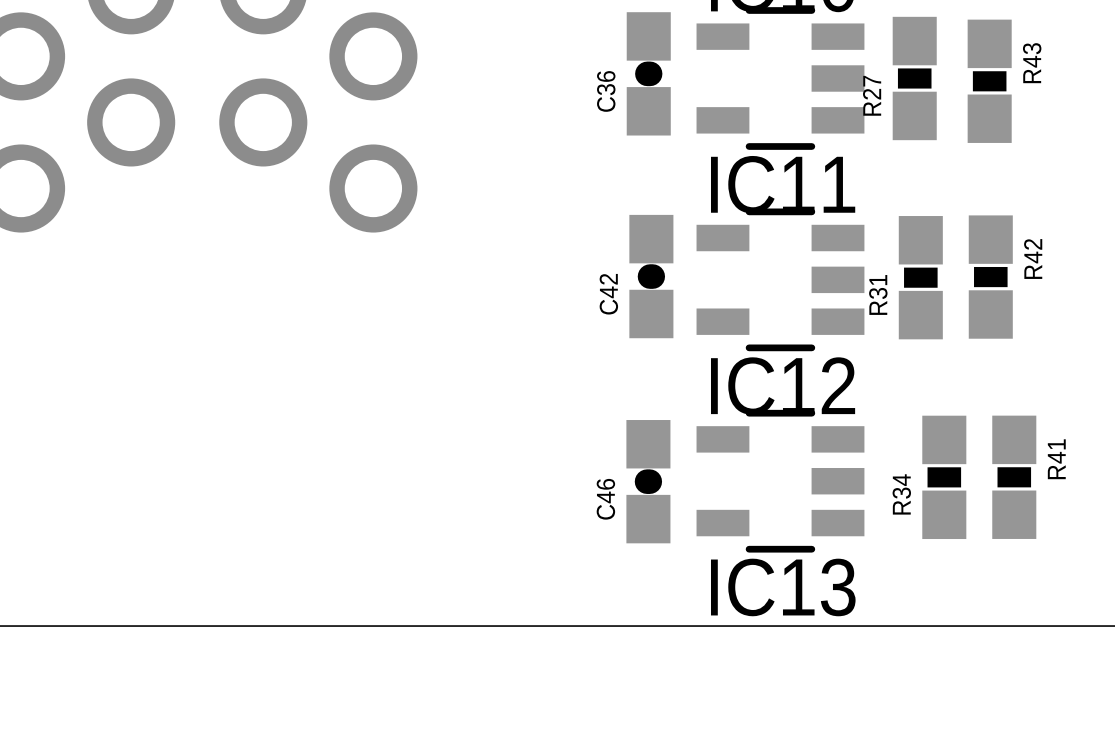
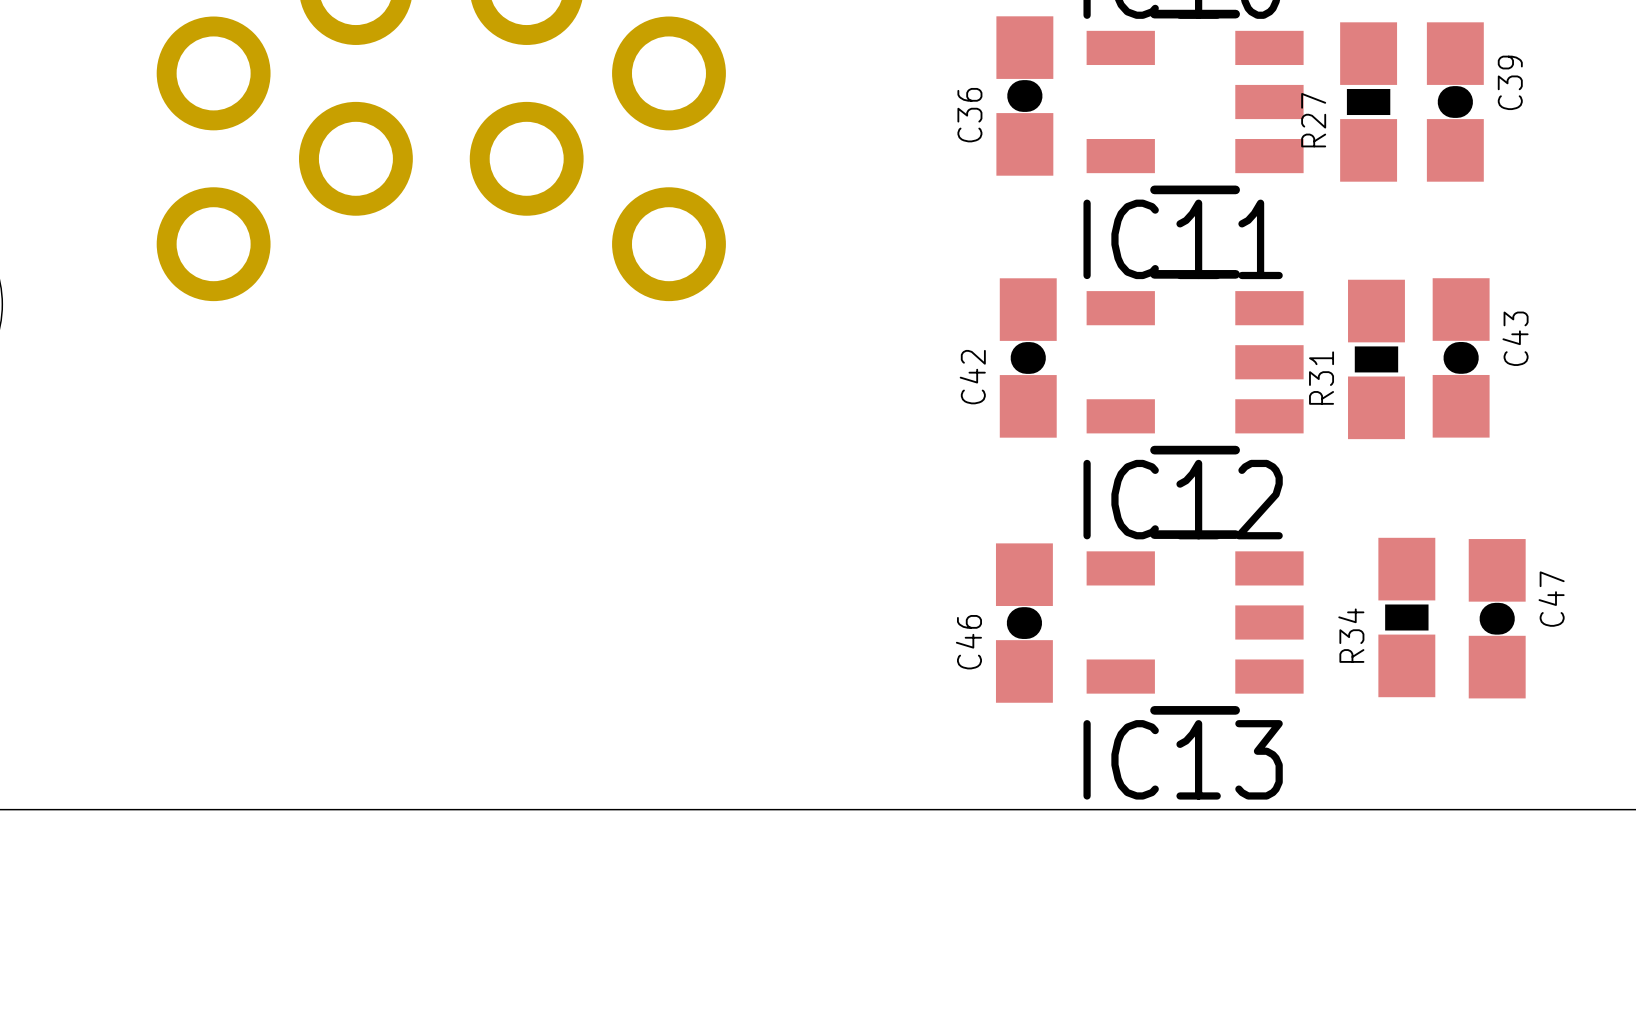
C39: none -> (1455, 102)
R43: (989, 81) -> none
C43: none -> (1461, 357)
R42: (990, 277) -> none
R41: (1014, 477) -> none
C47: none -> (1497, 618)

